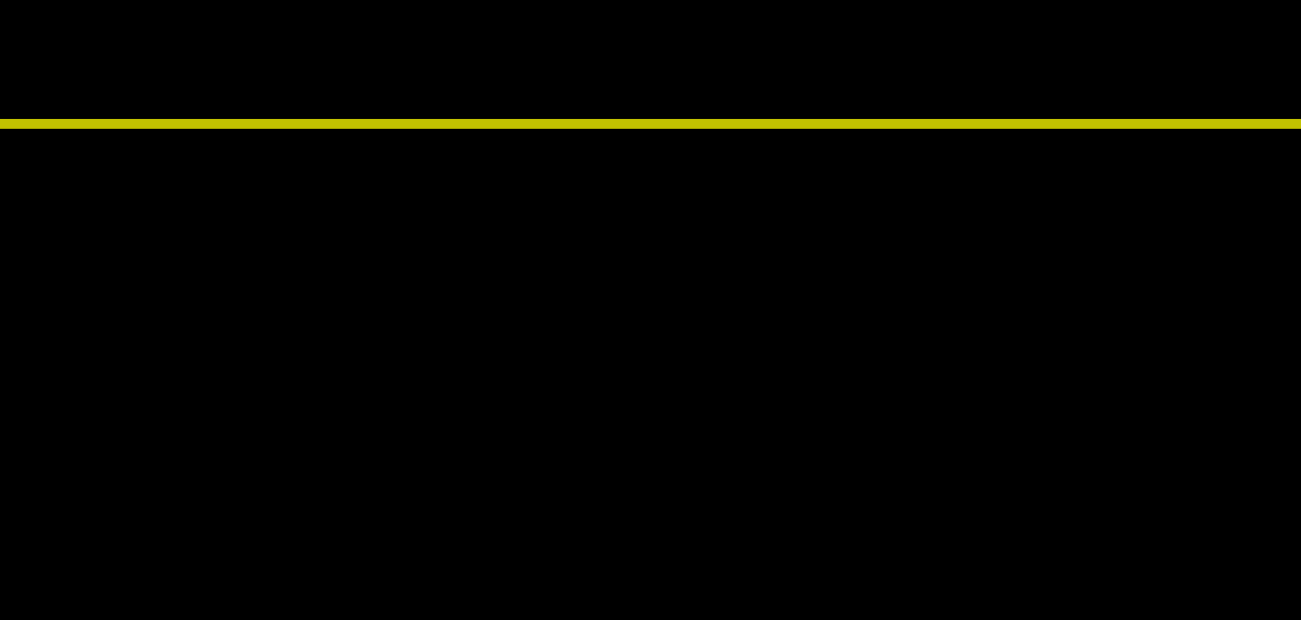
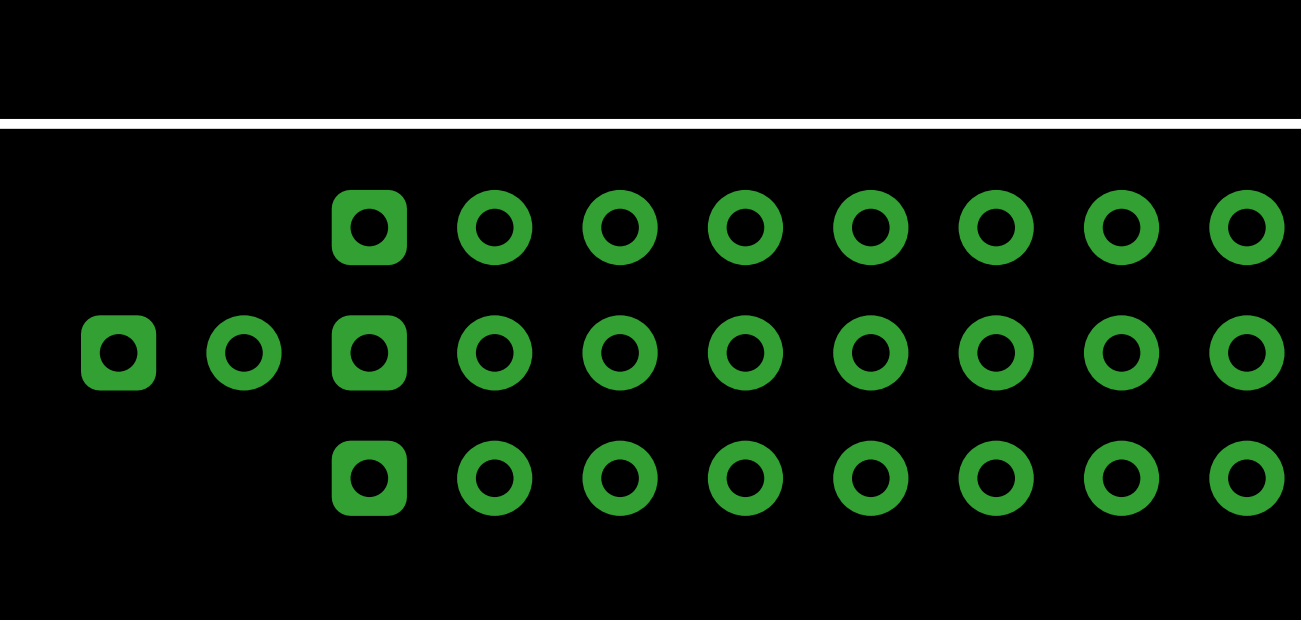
part: none -> (808, 227)
part: none -> (181, 352)
part: none -> (808, 352)
part: none -> (808, 478)

